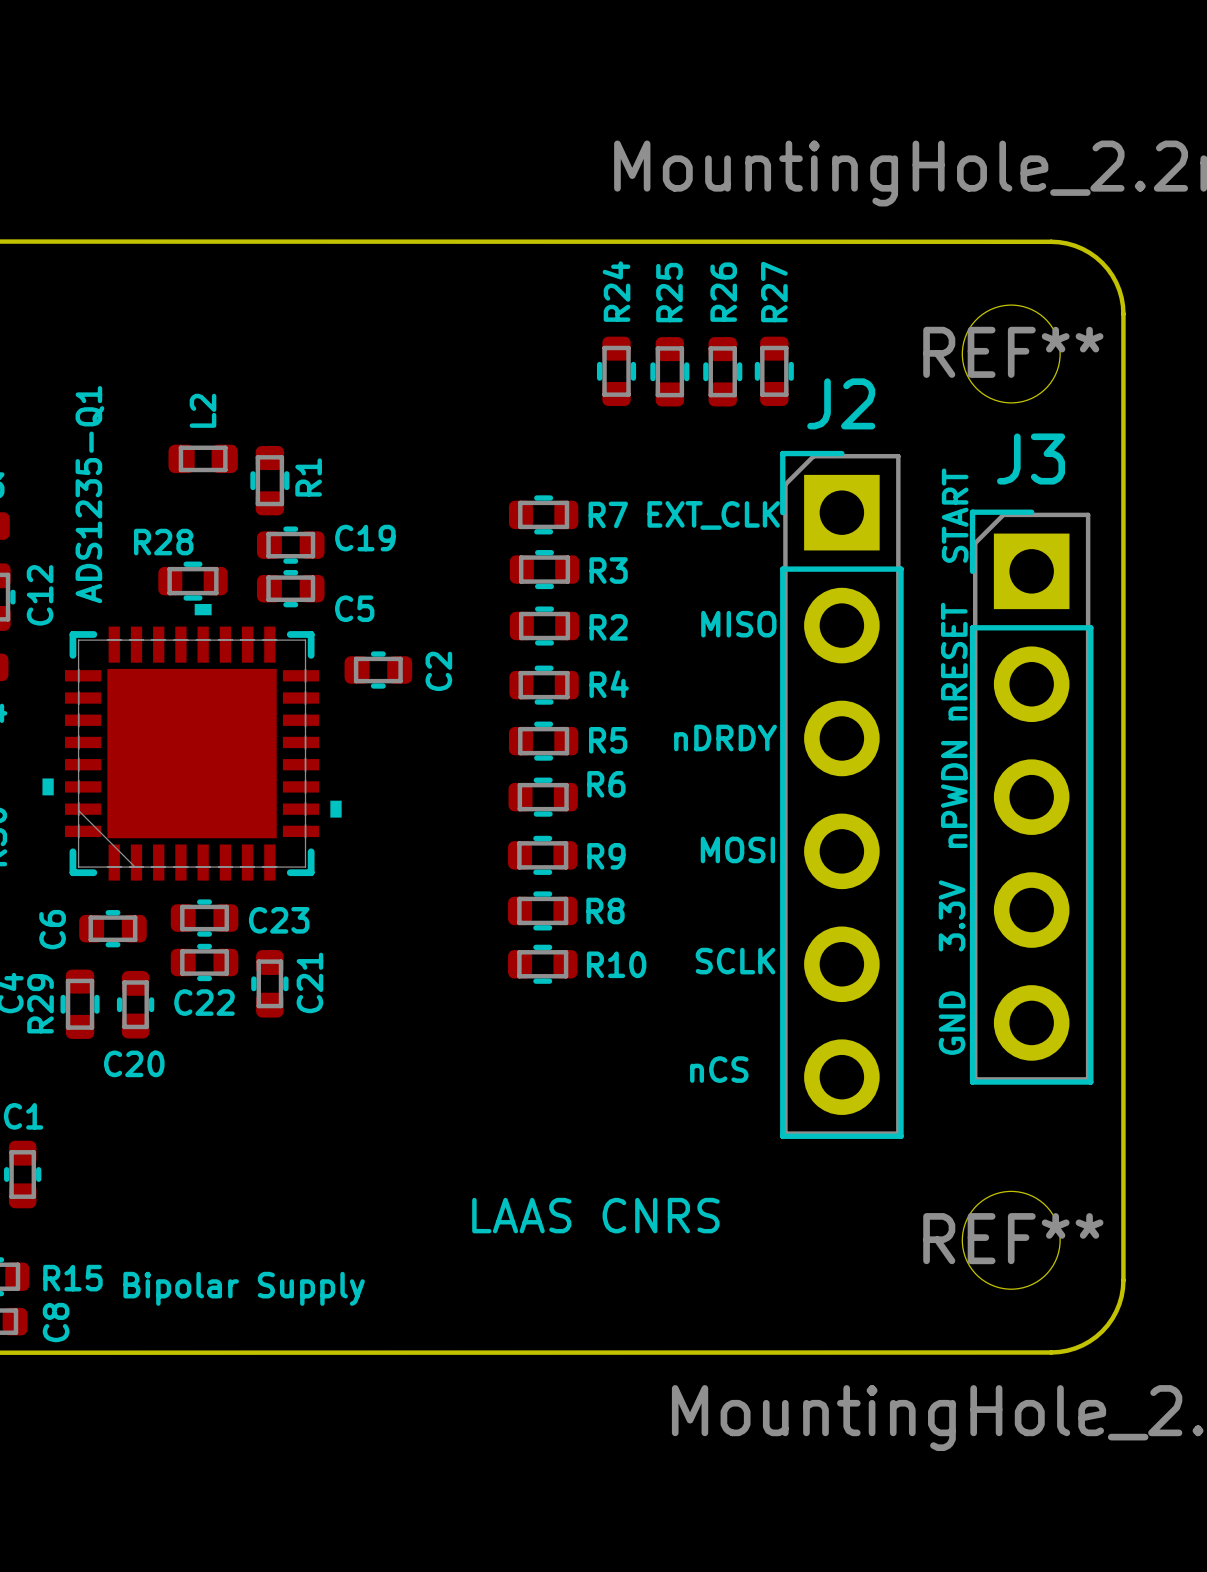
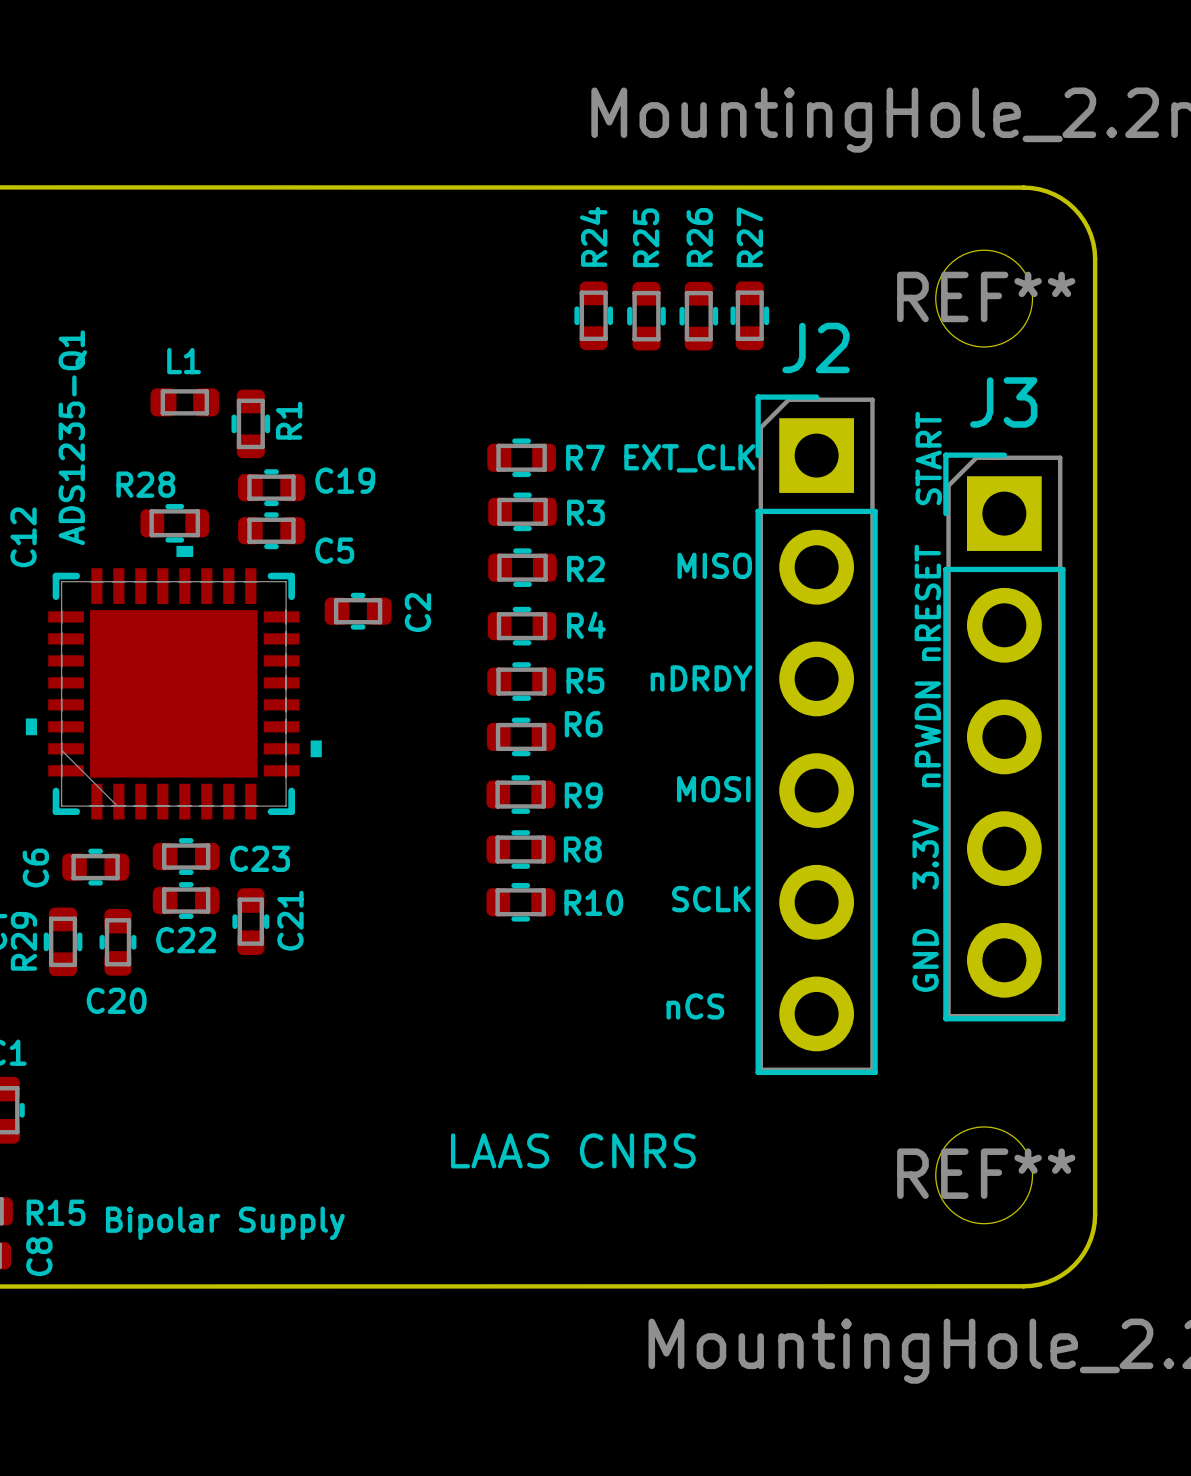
L2 name: L2 (202, 410) -> L1 (184, 361)

